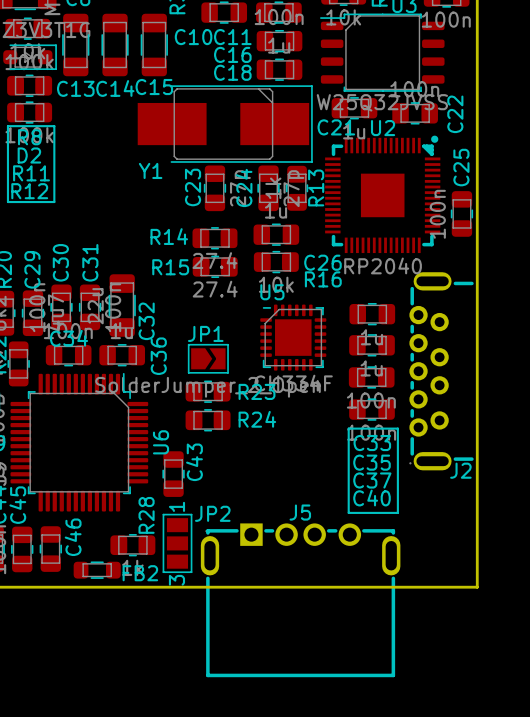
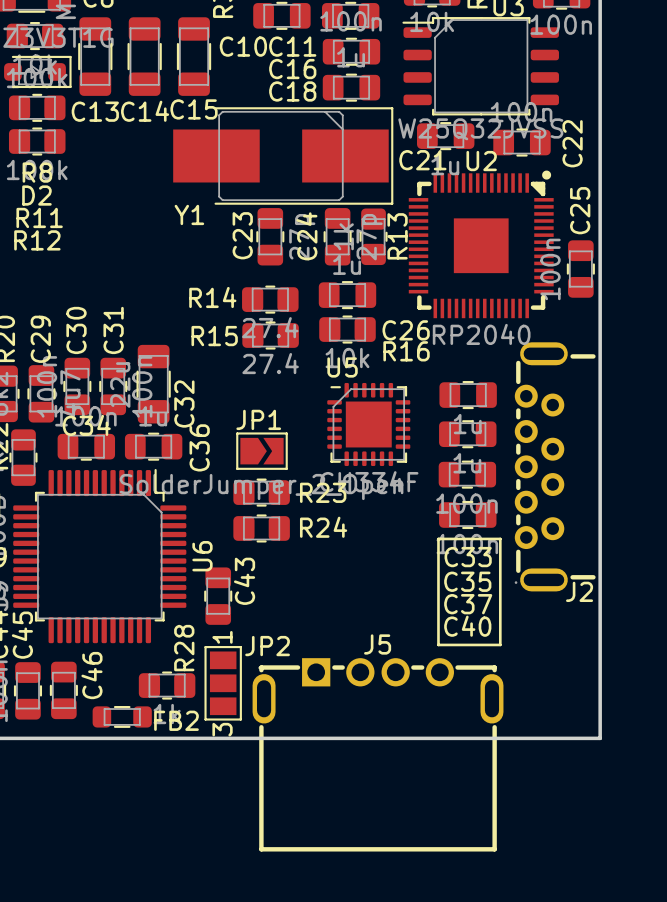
line: (7, 126) (54, 126) (54, 202) (7, 202) (7, 126) -> none

